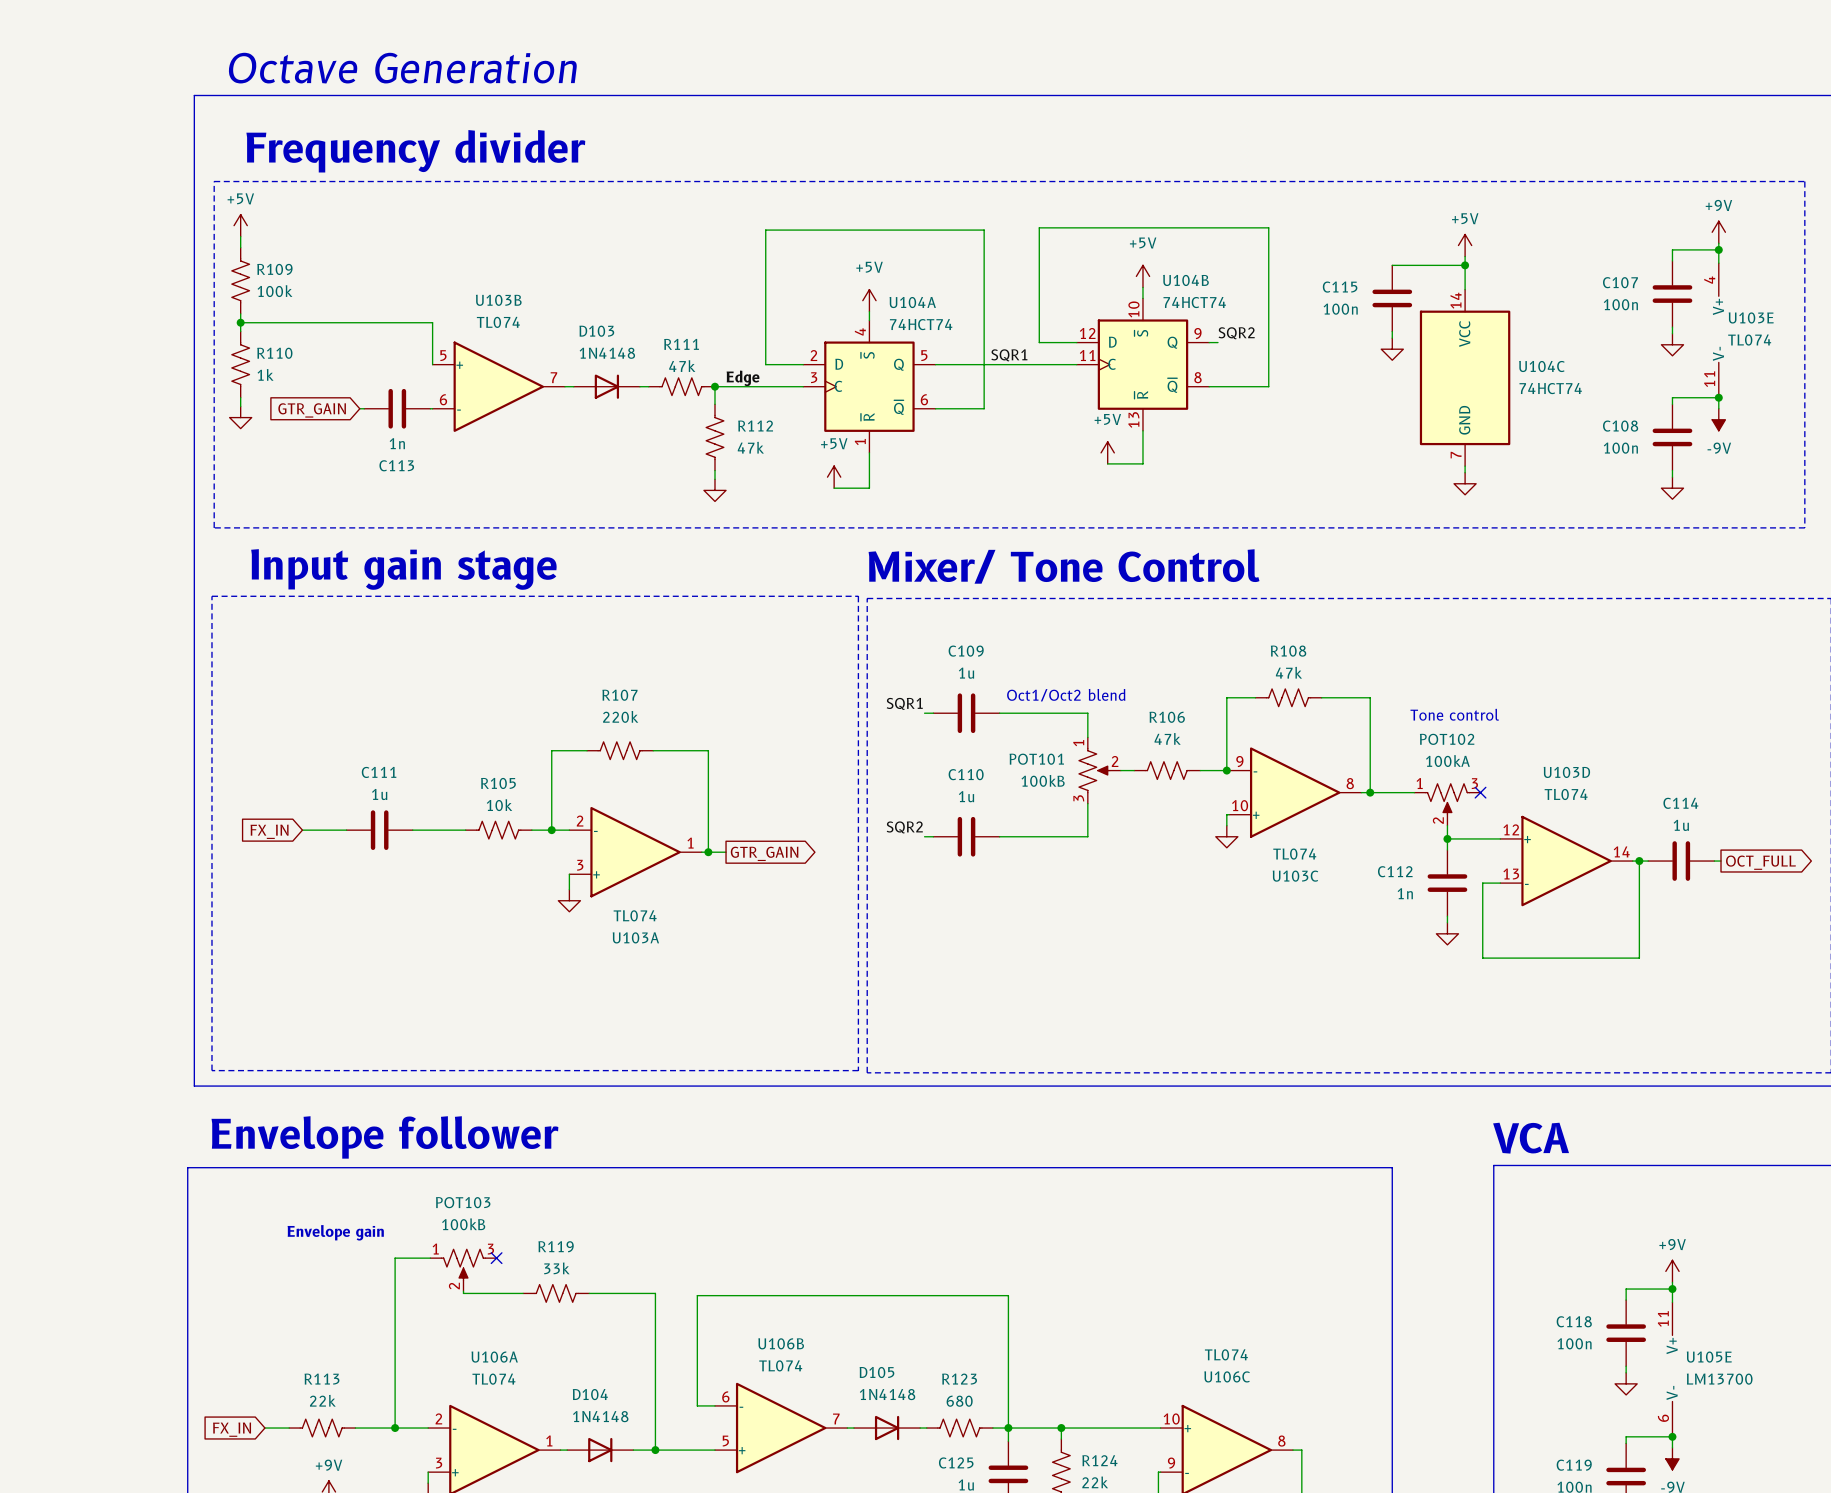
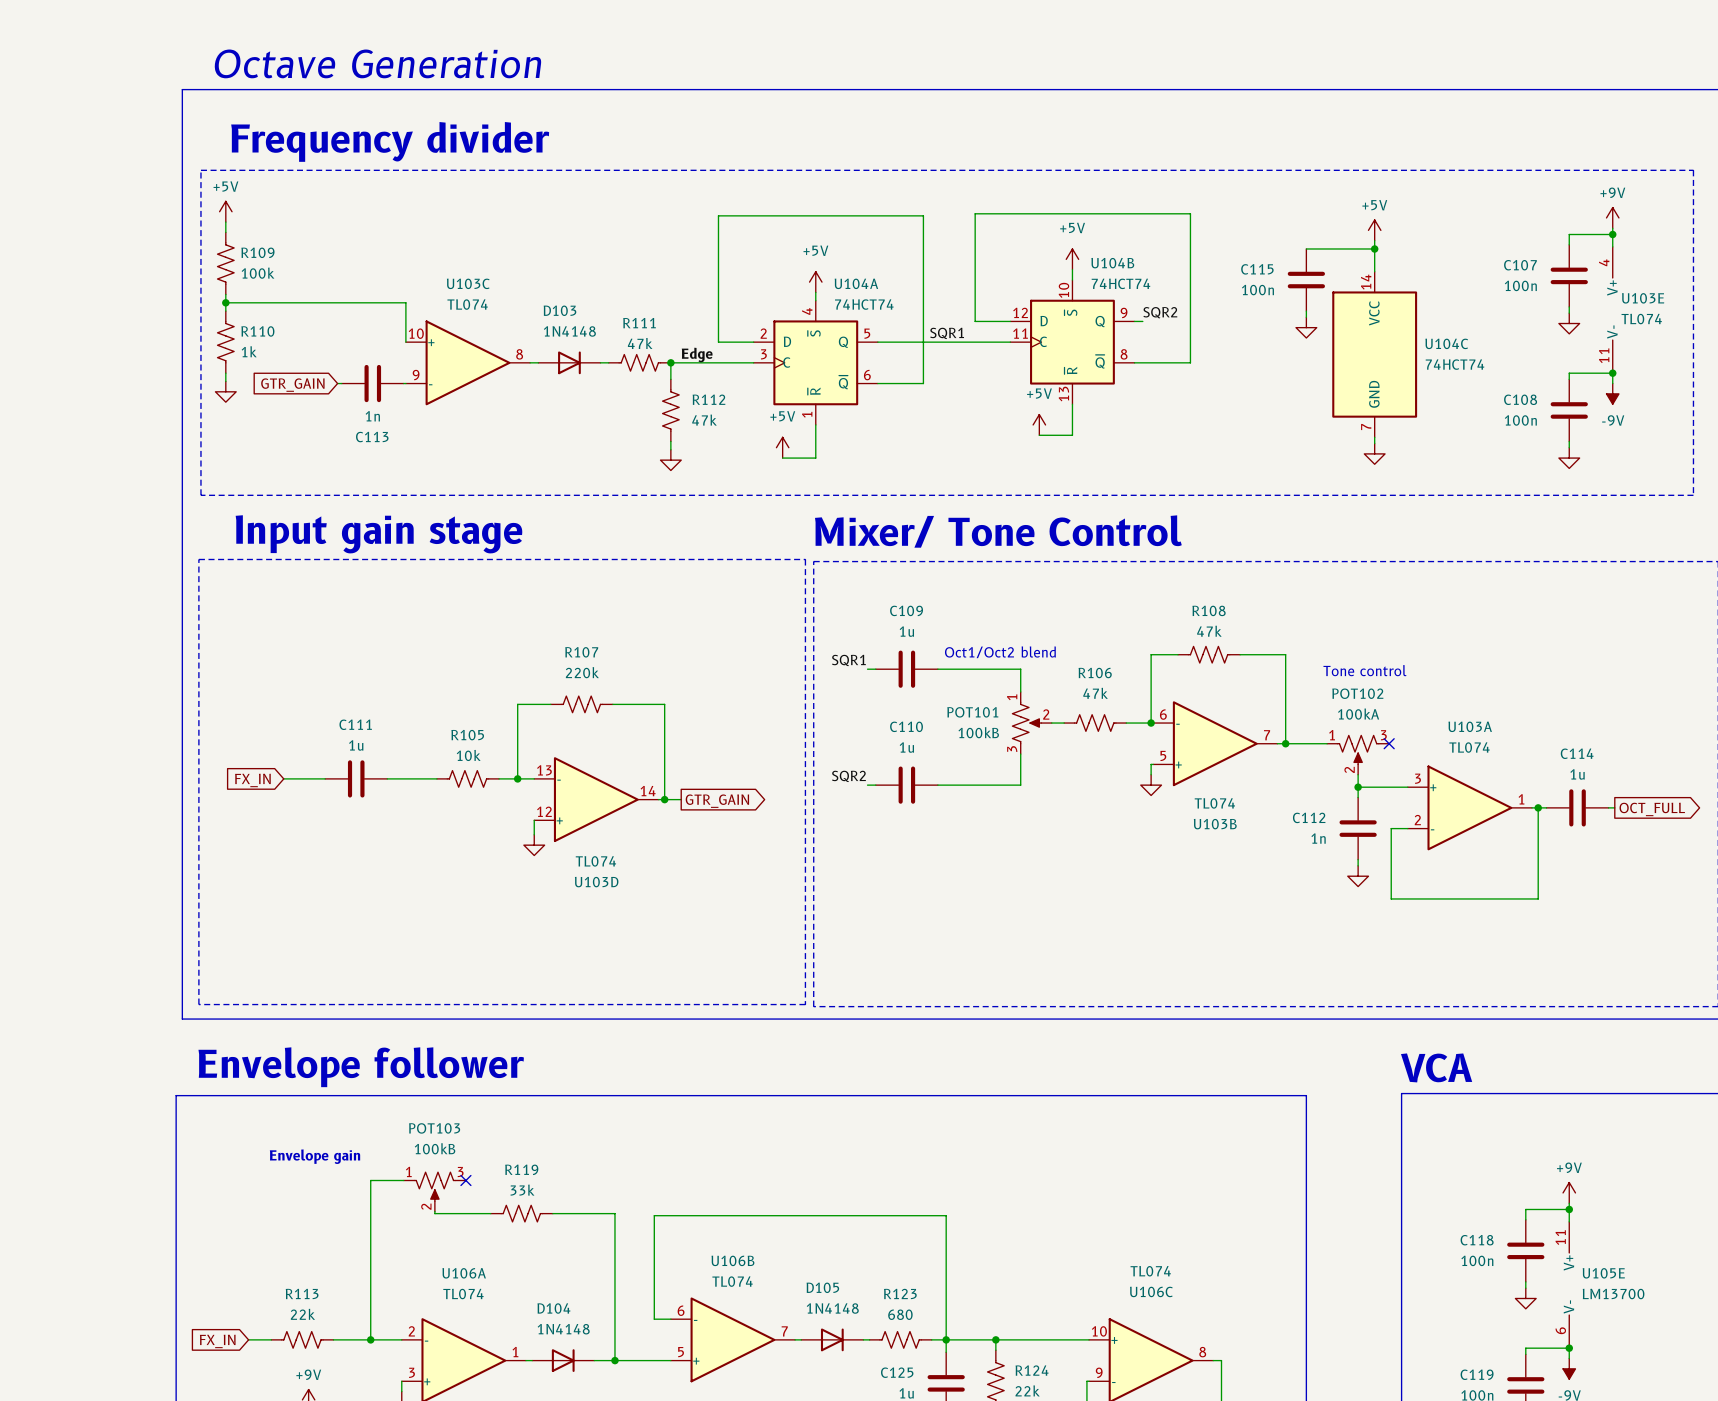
U103B flip: as is (498, 386) -> up-down (1215, 743)
U103B position: (498, 386) -> (1215, 743)
U103C flip: as is (1295, 792) -> up-down (468, 362)
U103C position: (1295, 792) -> (468, 362)
U103A flip: as is (635, 852) -> up-down (1469, 807)
U103A position: (635, 852) -> (1469, 807)
U103D flip: as is (1566, 861) -> up-down (596, 799)
U103D position: (1566, 861) -> (596, 799)

